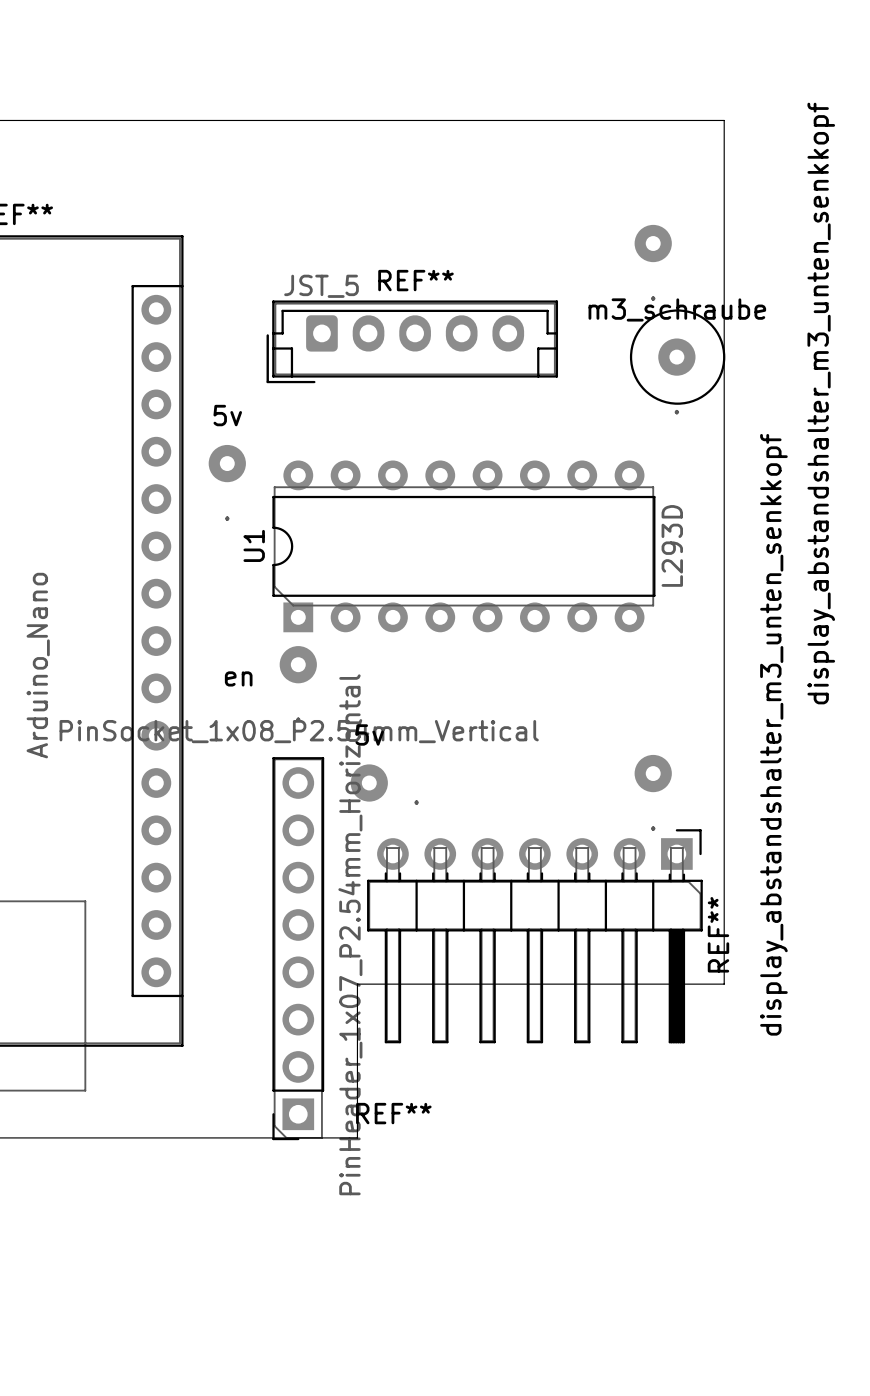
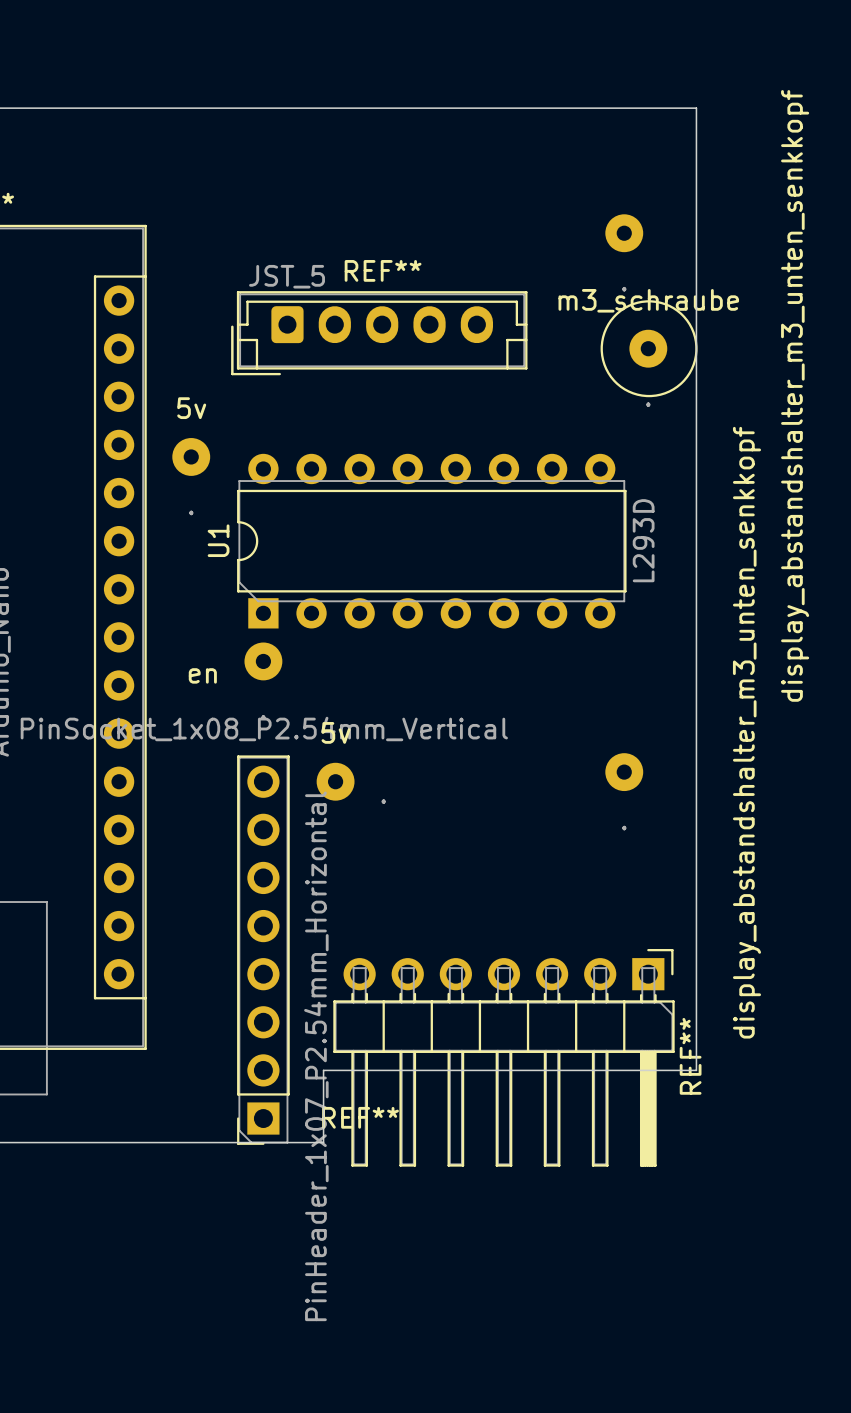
REF** position: (534, 936) -> (503, 1057)
board edge: (724, 984) (357, 984) (357, 1066) -> (696, 986) (696, 1070) (323, 1070)

